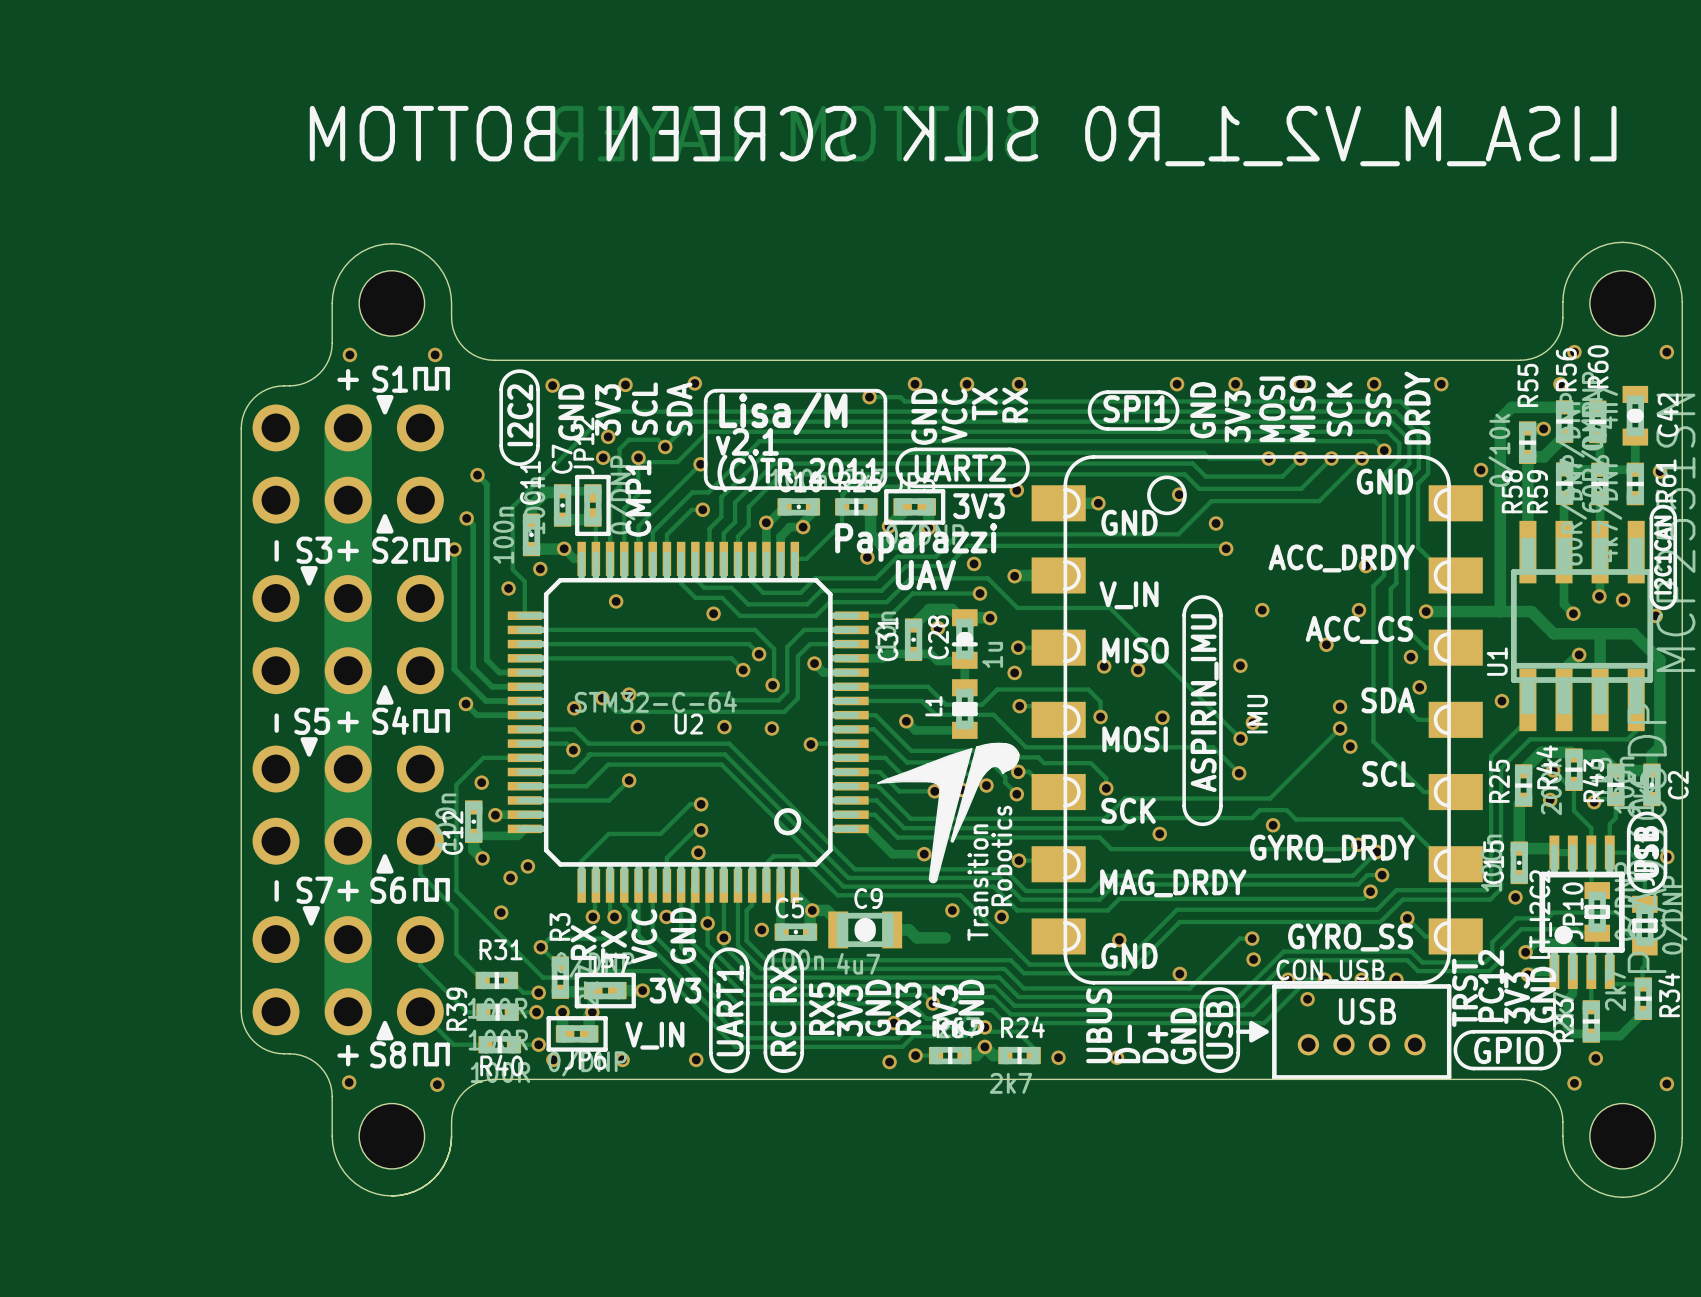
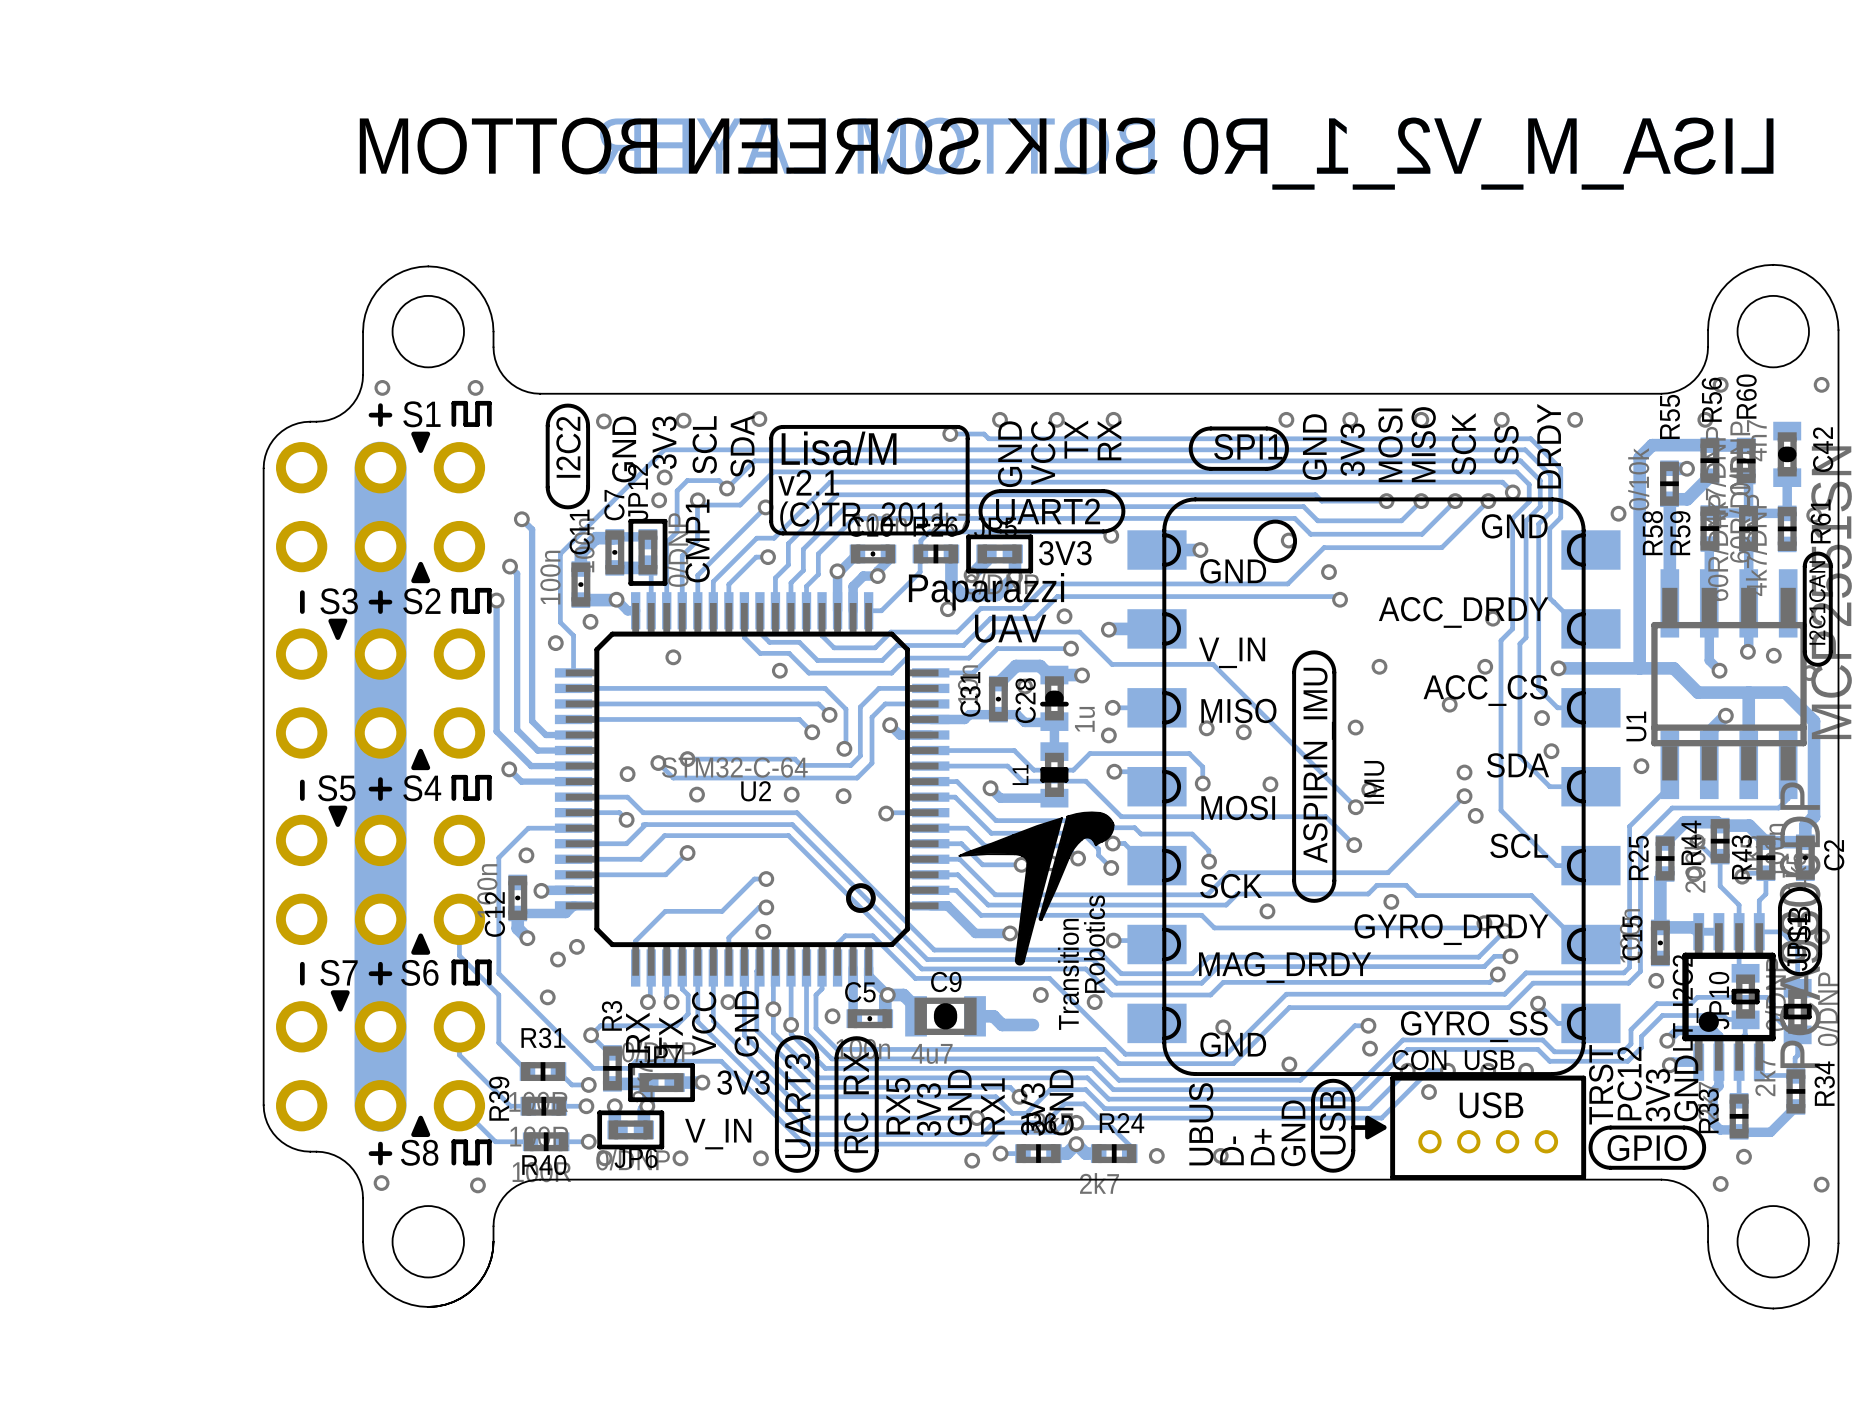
text: RX3 (908, 1008) -> RX1 (992, 1106)
text: UART1 (730, 1010) -> UART3 (797, 1105)

